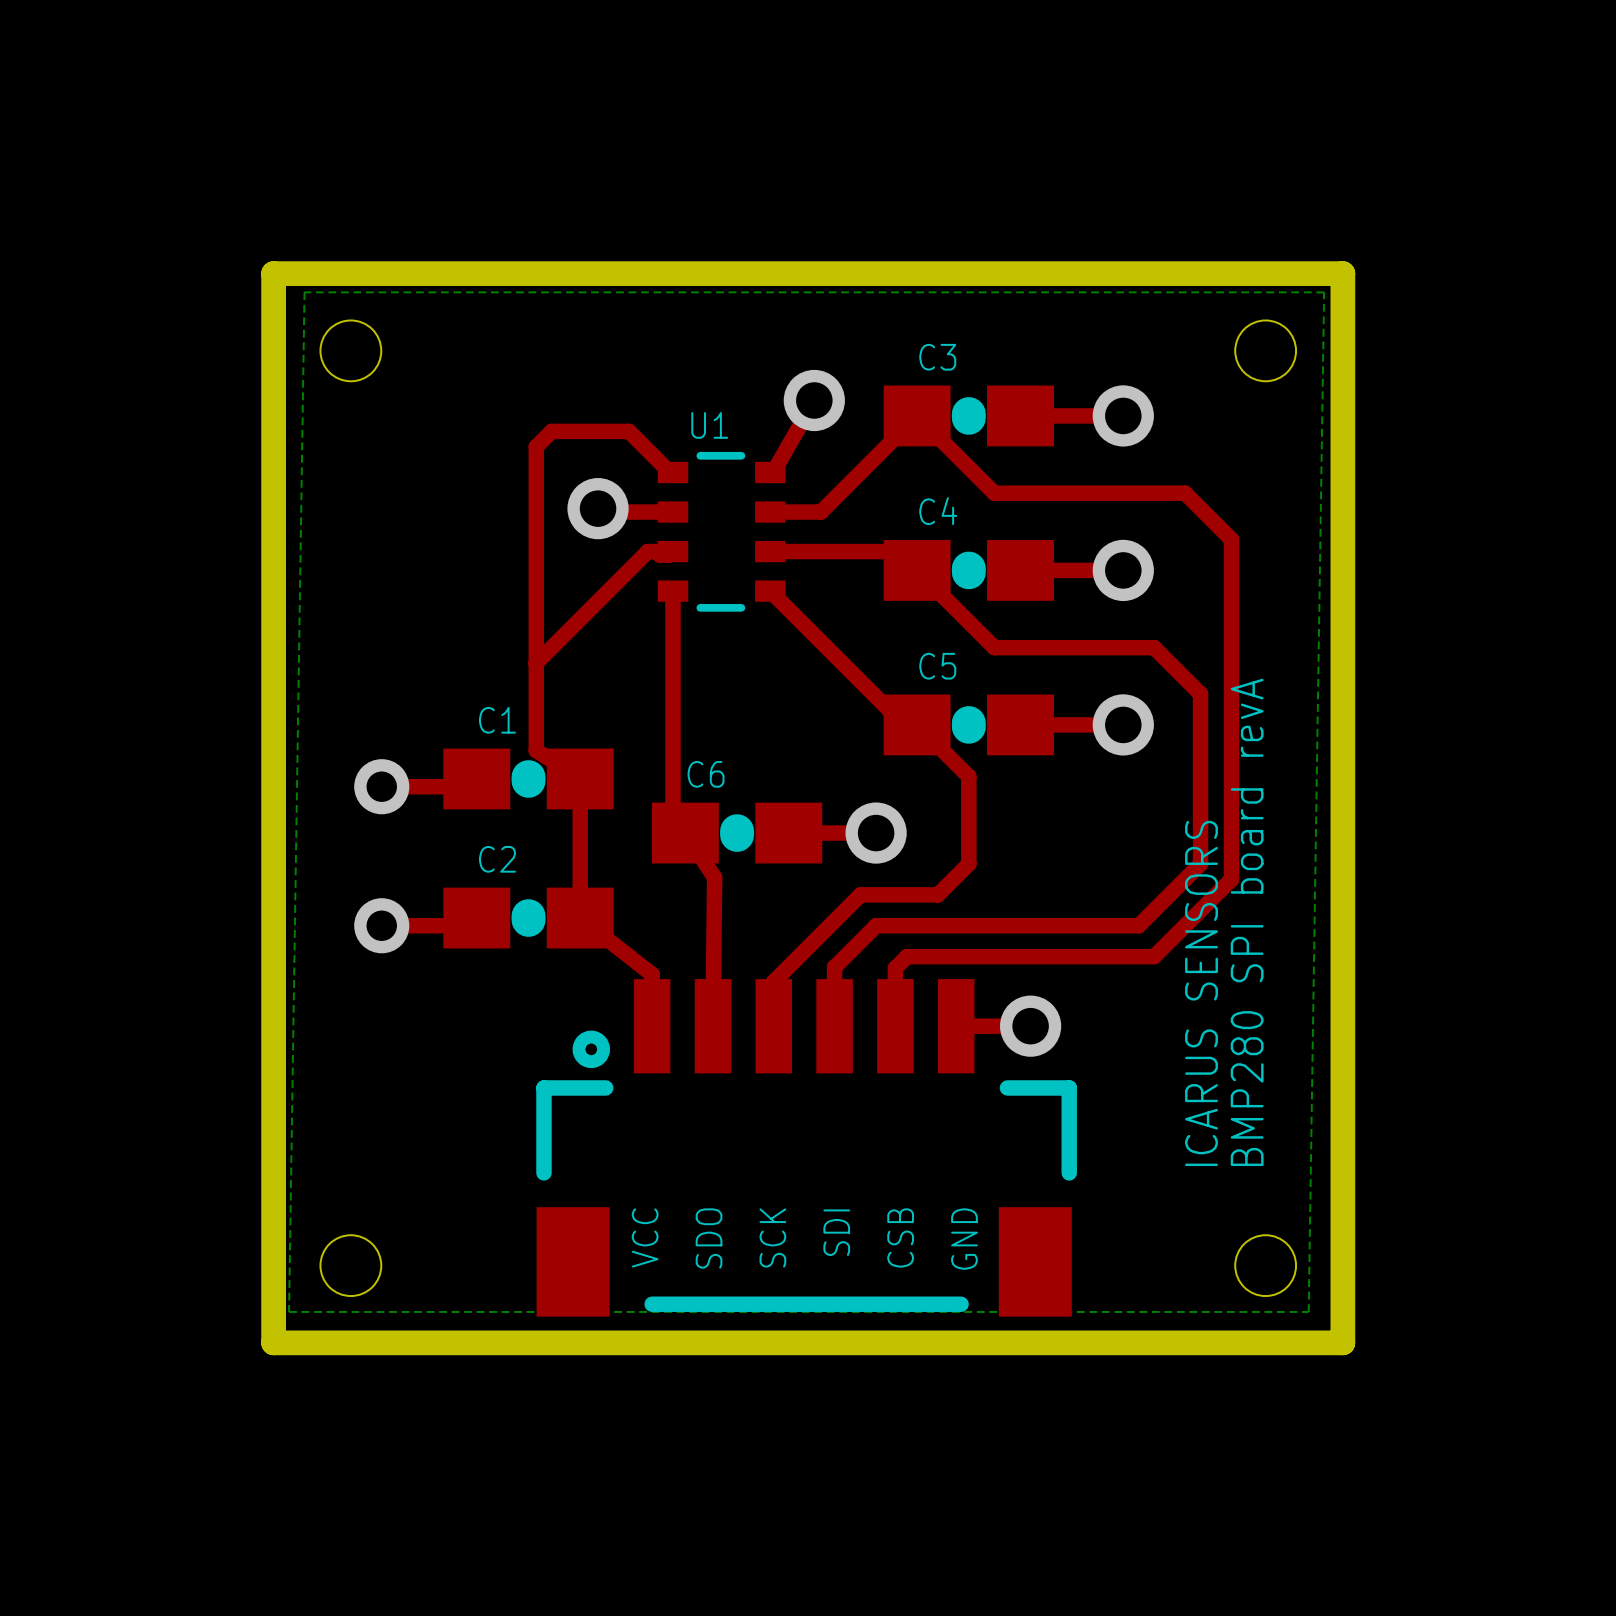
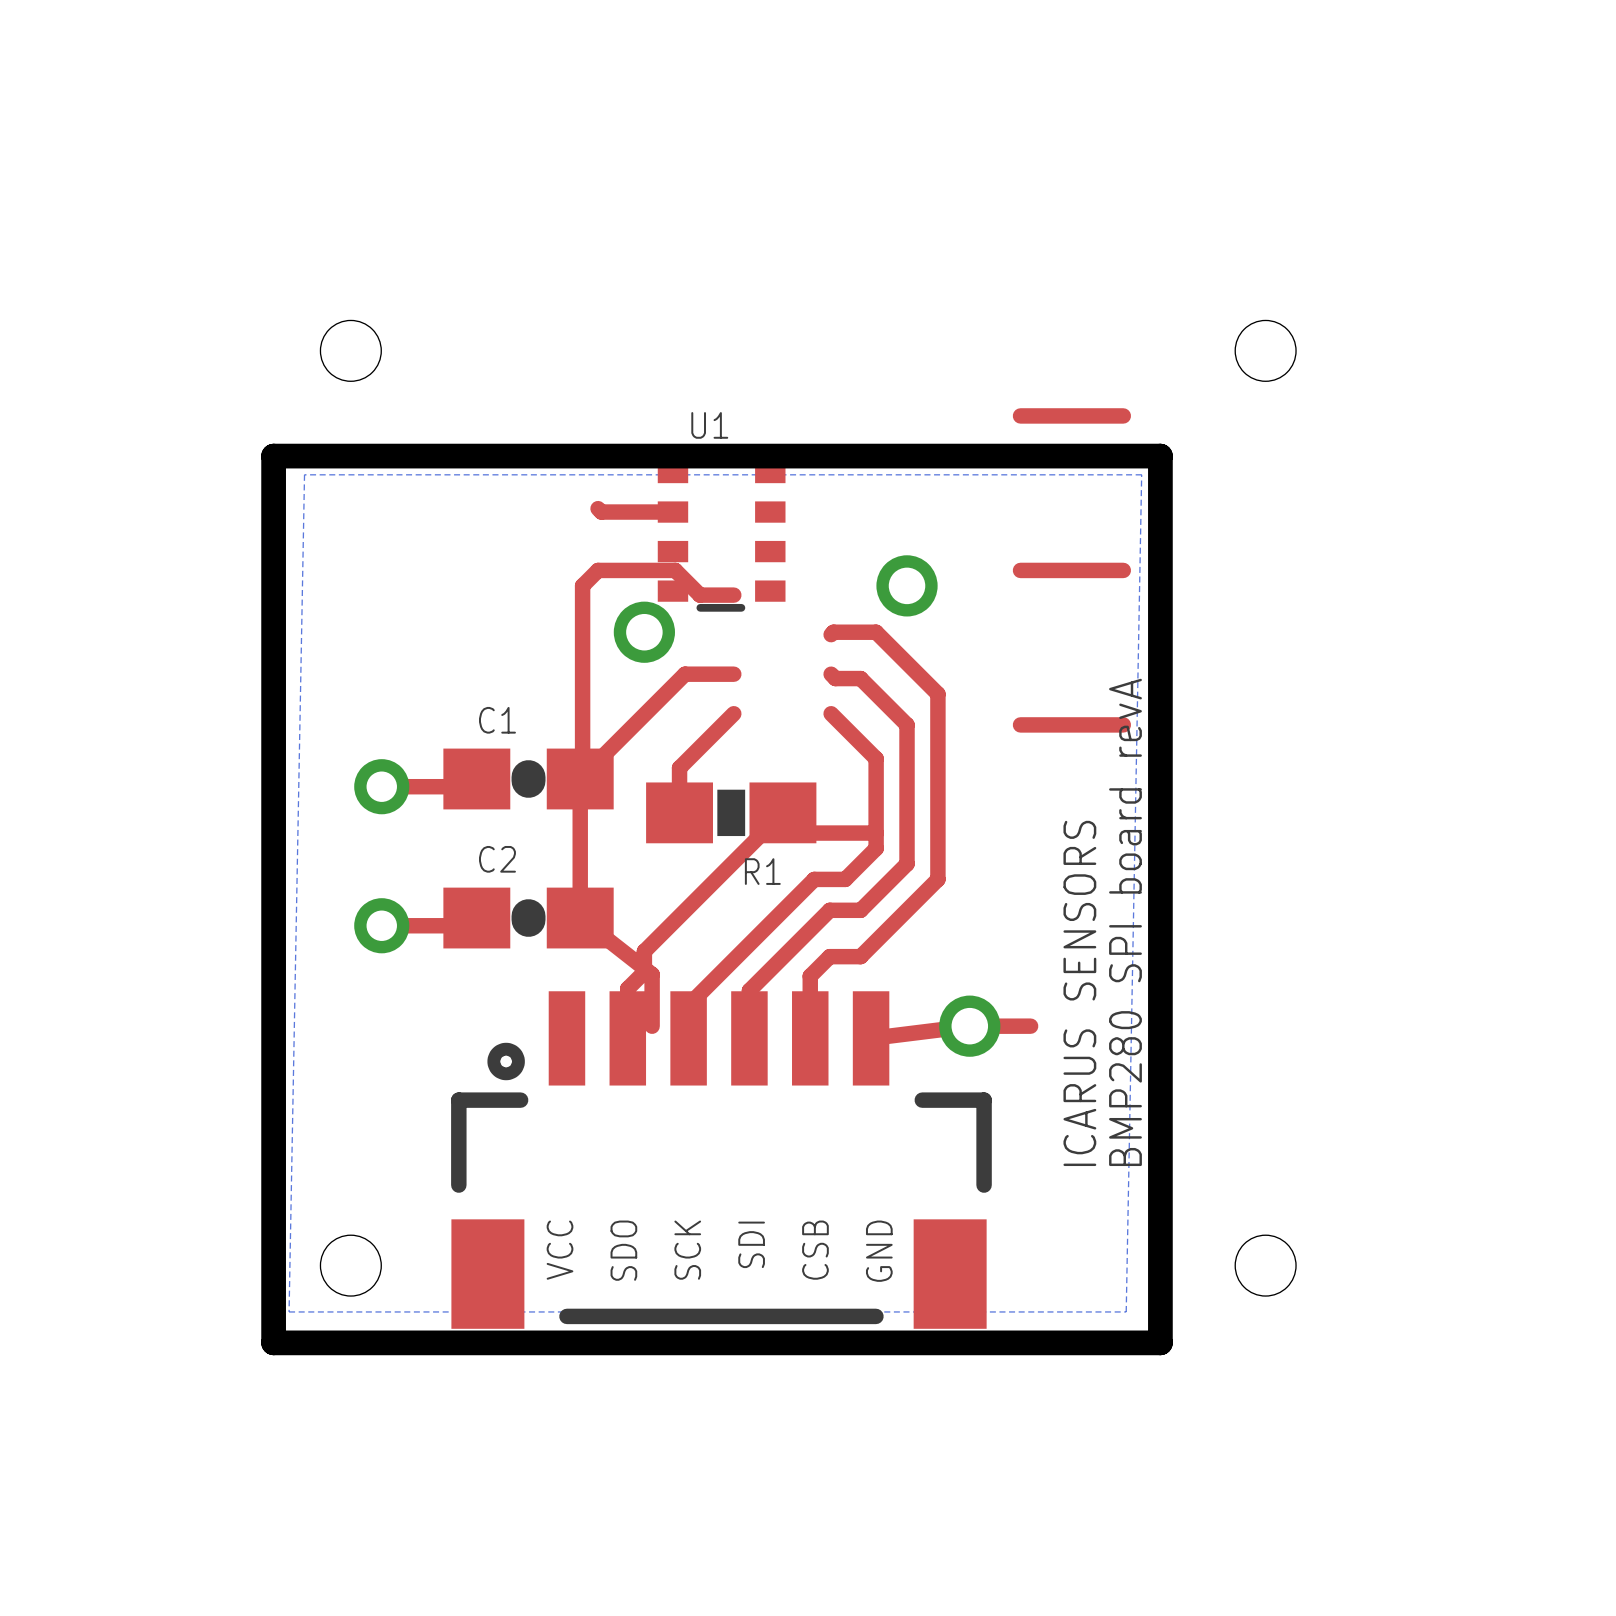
top track: (814, 400) (773, 472) (770, 472) -> none
via: (814, 400) -> none
C3: (968, 415) -> none
via: (1123, 415) -> none
board edge: (273, 456) (273, 273) (1342, 273) (1342, 1342) (1160, 1342) -> (273, 456) (1160, 456) (1160, 1342)
top track: (672, 472) (670, 472) (628, 431) (551, 431) (536, 446) (536, 750) (580, 778) -> (733, 674) (685, 674) (580, 778)
via position: (598, 508) -> (644, 632)
top track: (770, 512) (821, 512) (917, 415) (994, 493) (1185, 493) (1231, 539) (1231, 879) (1154, 956) (907, 956) (895, 968) (895, 1026) -> none
top track: (663, 551) (659, 554) (669, 554) (672, 551) (647, 551) (536, 663) -> none
top track: (770, 551) (898, 551) (994, 647) (1154, 647) (1200, 694) (1200, 863) (1138, 925) (876, 925) (834, 967) (834, 1026) -> none
C4: (968, 570) -> none
via: (1123, 570) -> none
via: none -> (907, 585)
top track: (672, 591) (672, 820) (685, 833) (714, 877) (712, 1026) -> none
top track: (770, 591) (904, 724) (917, 724) (968, 776) (968, 863) (937, 894) (860, 894) (773, 981) (773, 1026) -> none
top track: none -> (733, 595) (699, 595) (675, 570) (598, 570) (582, 585) (582, 776)
top track: none -> (831, 634) (833, 632) (876, 632) (937, 694) (937, 879) (860, 956) (829, 956) (810, 976) (810, 1038)
top track: none -> (831, 674) (835, 678) (860, 678) (907, 724) (907, 863) (860, 910) (829, 910) (749, 990) (749, 1038)
top track: none -> (733, 713) (679, 767) (679, 812)
top track: none -> (831, 713) (876, 758) (876, 848) (845, 879) (814, 879) (688, 1005) (688, 1038)
C5: (968, 724) -> none
via: (1123, 724) -> none
R1: none -> (731, 812)
top track: none -> (782, 812) (644, 951) (644, 972) (627, 988) (627, 1038)
C6: (737, 833) -> none
via: (876, 833) -> none
text position: BMP280 SPI board revA (1247, 922) -> BMP280 SPI board revA (1125, 922)
text position: ICARUS SENSORS (1201, 993) -> ICARUS SENSORS (1079, 993)
top track: none -> (969, 1026) (871, 1038)
via position: (1030, 1026) -> (969, 1026)
part position: (806, 1147) -> (721, 1160)
bottom zone outline: (289, 1311) (304, 292) (1324, 292) (1308, 1311) (1126, 1311) -> (289, 1311) (304, 474) (1141, 474) (1126, 1311)

